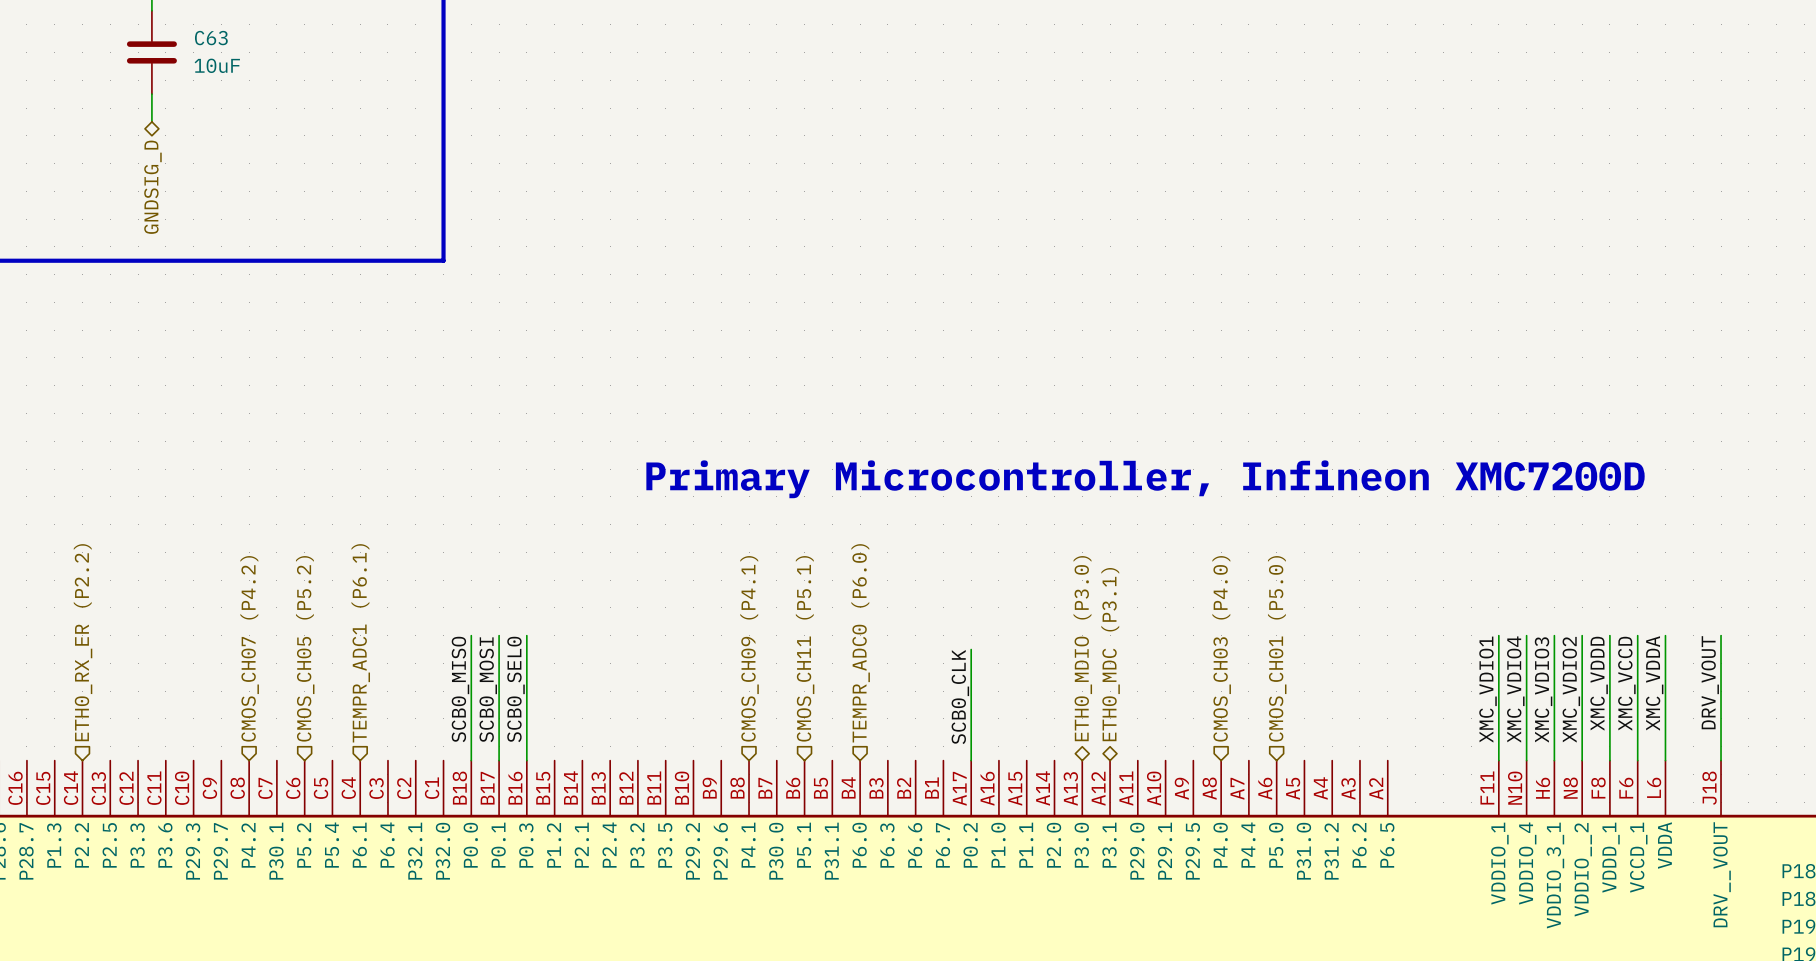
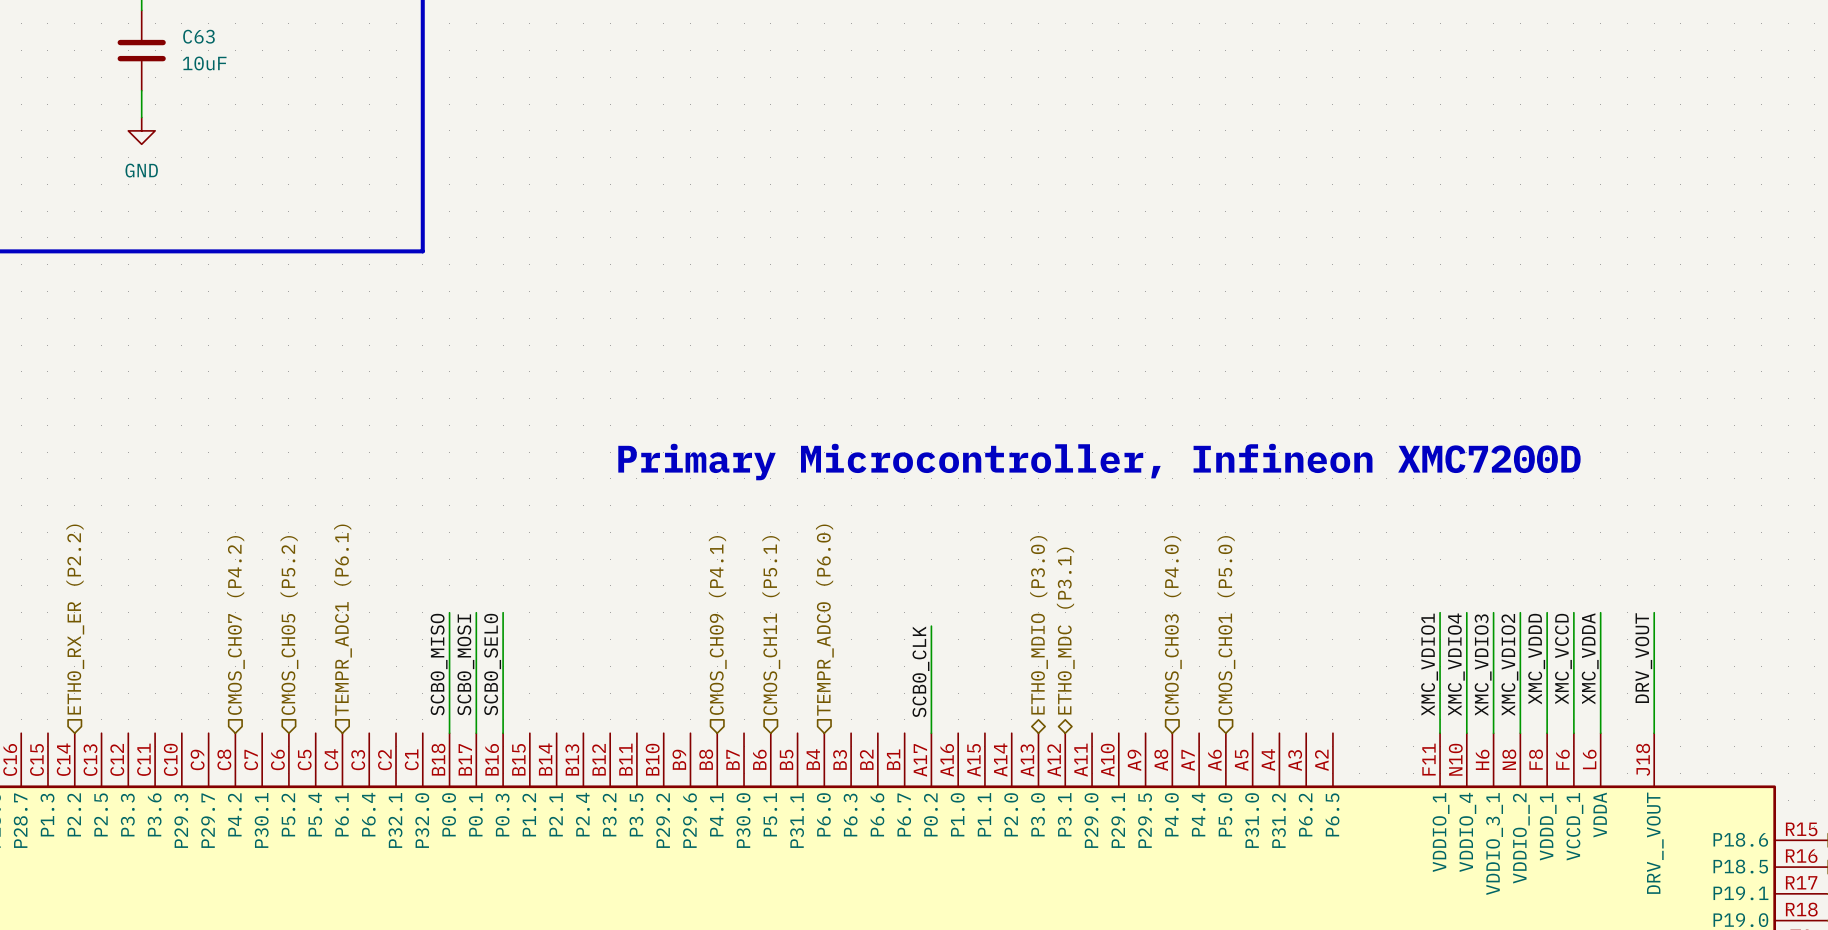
power symbol: none -> GND (141, 130)
hierarchical label: GNDSIG_D (152, 187) -> none

